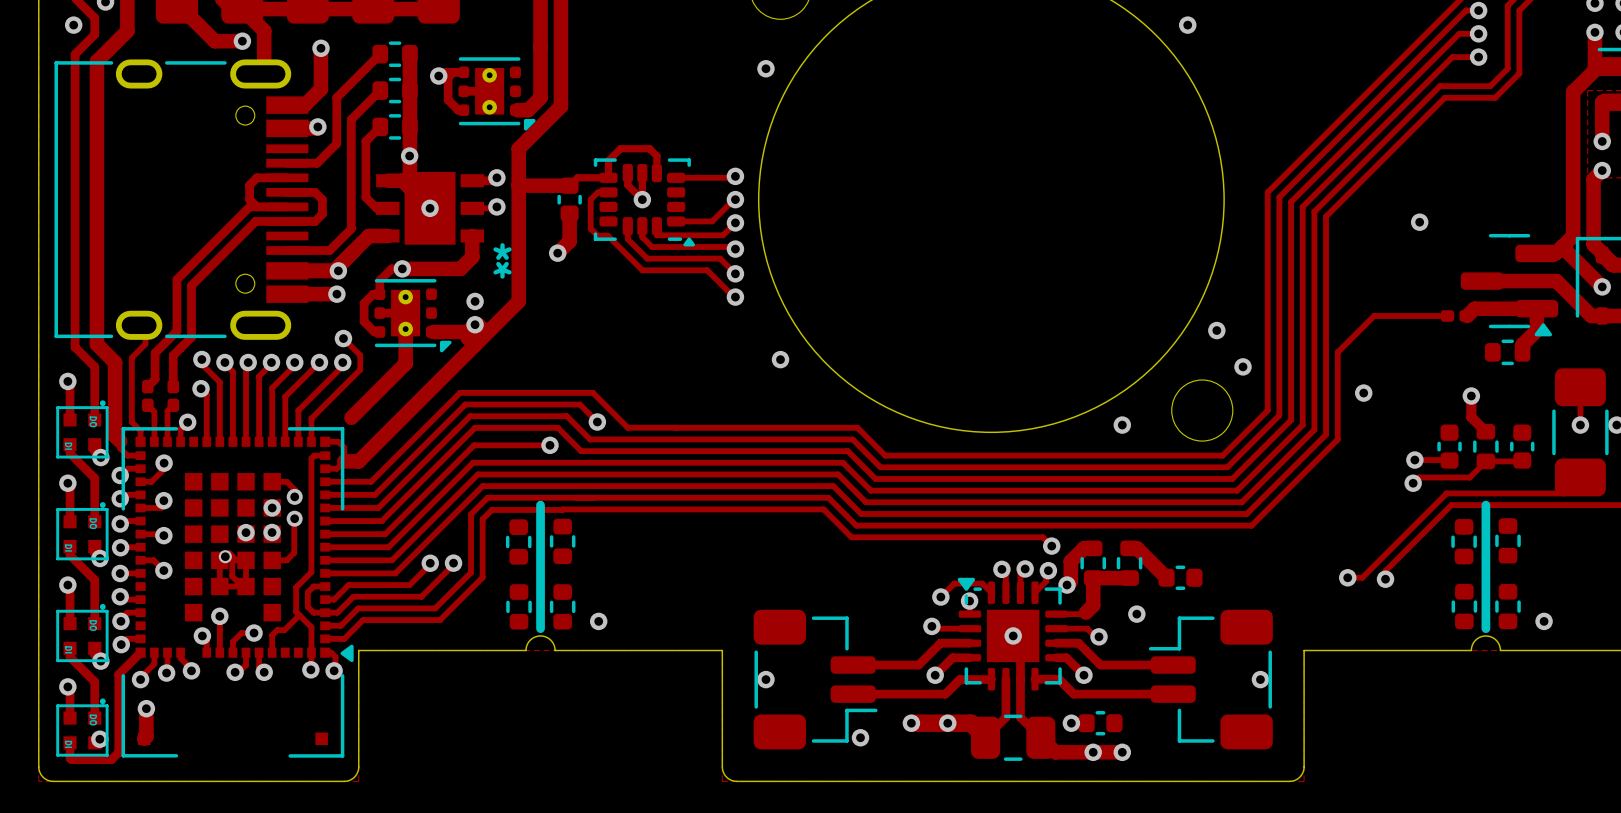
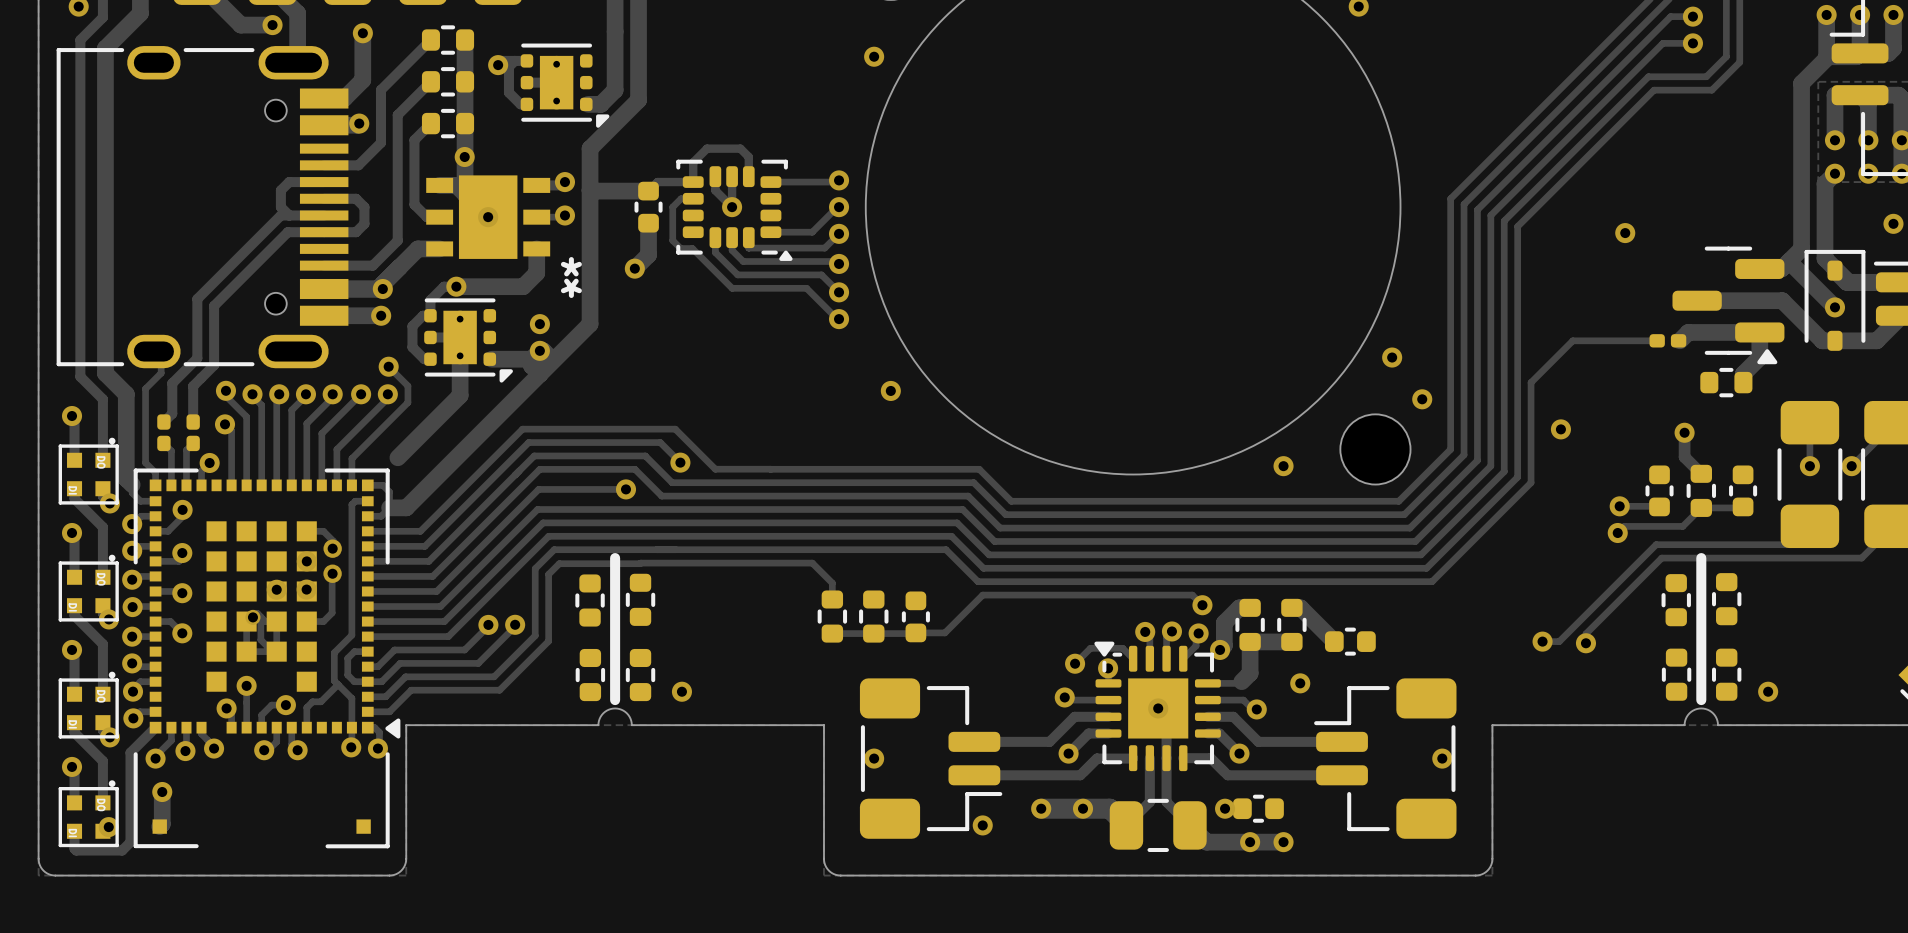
track: (712, 509) (823, 509) (851, 537) (860, 537) -> (832, 633) (944, 632) (982, 595)
track: none -> (812, 563) (832, 583) (832, 599)
part: none -> (832, 616)
part: none -> (873, 616)
part: none -> (915, 616)

